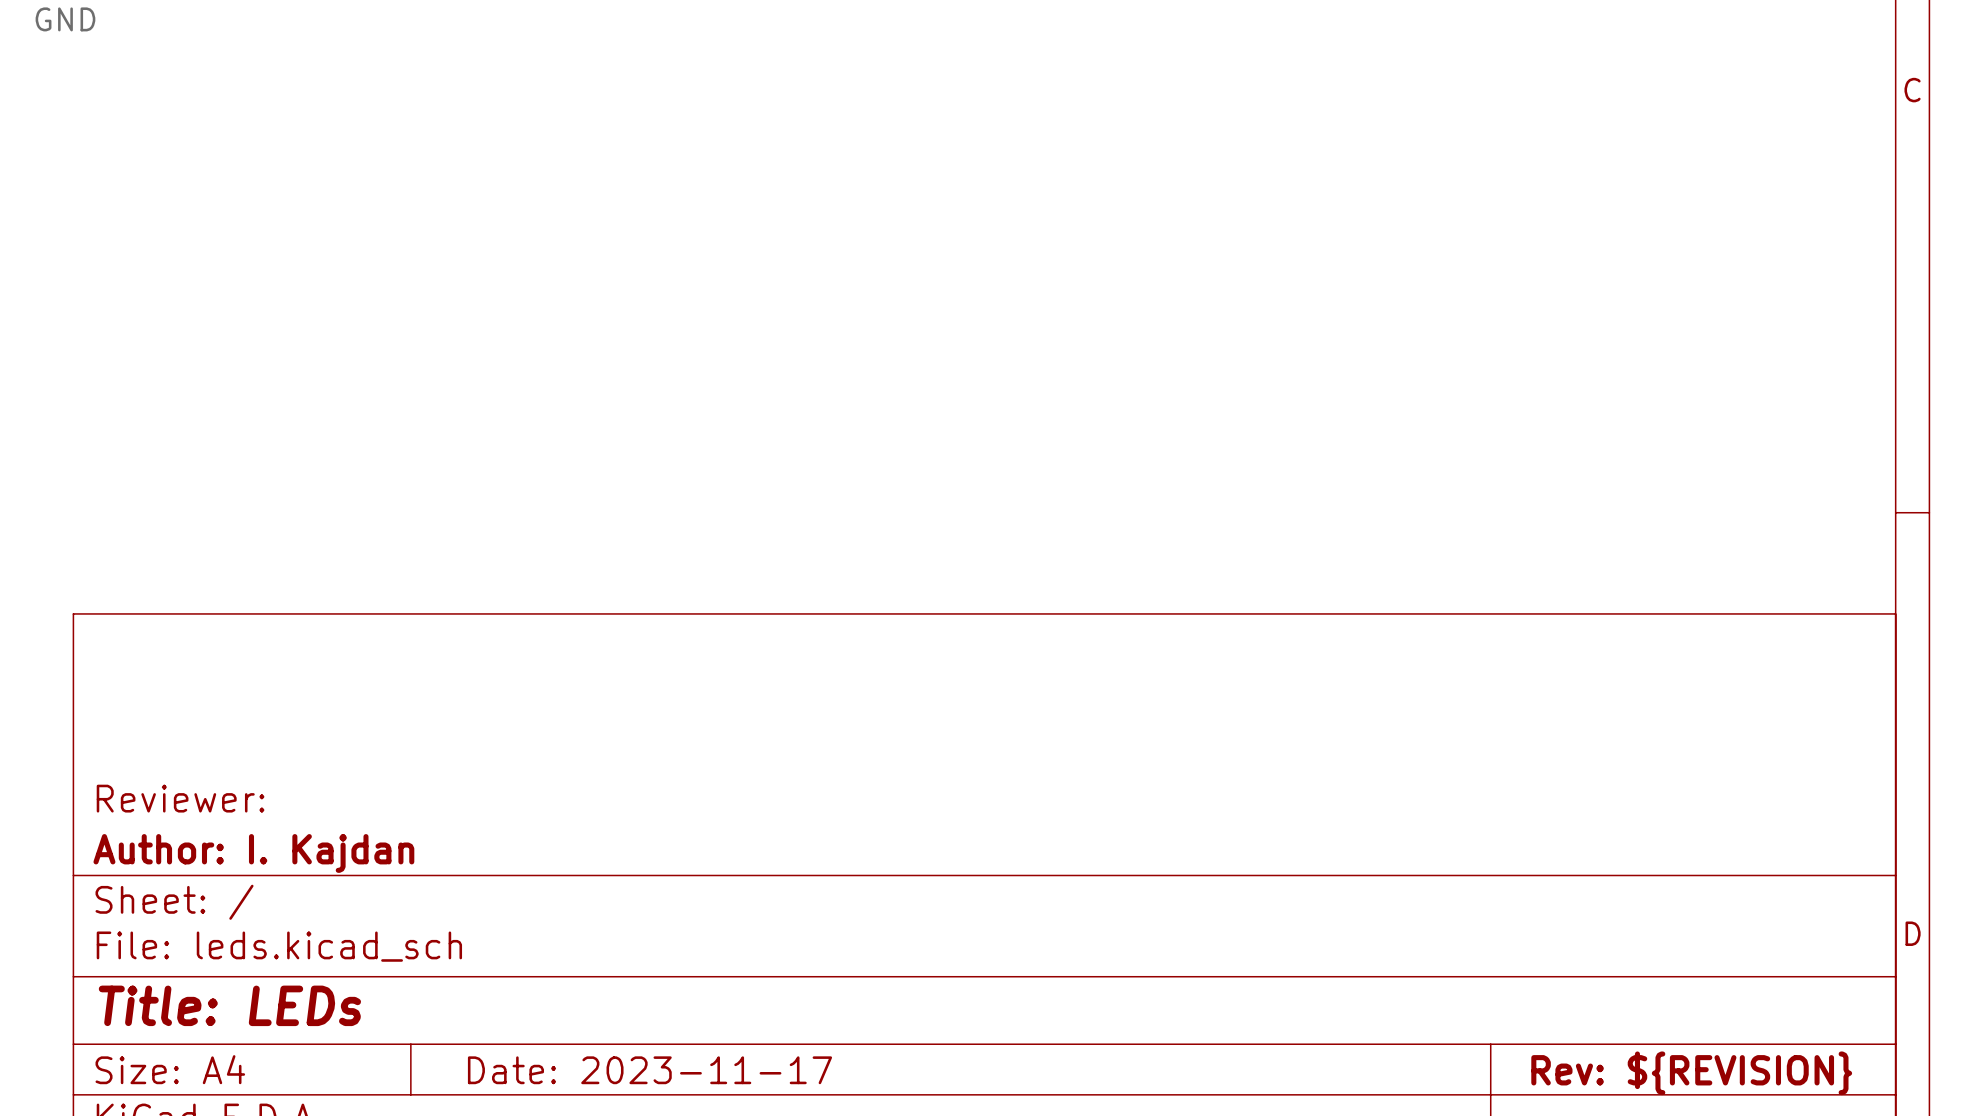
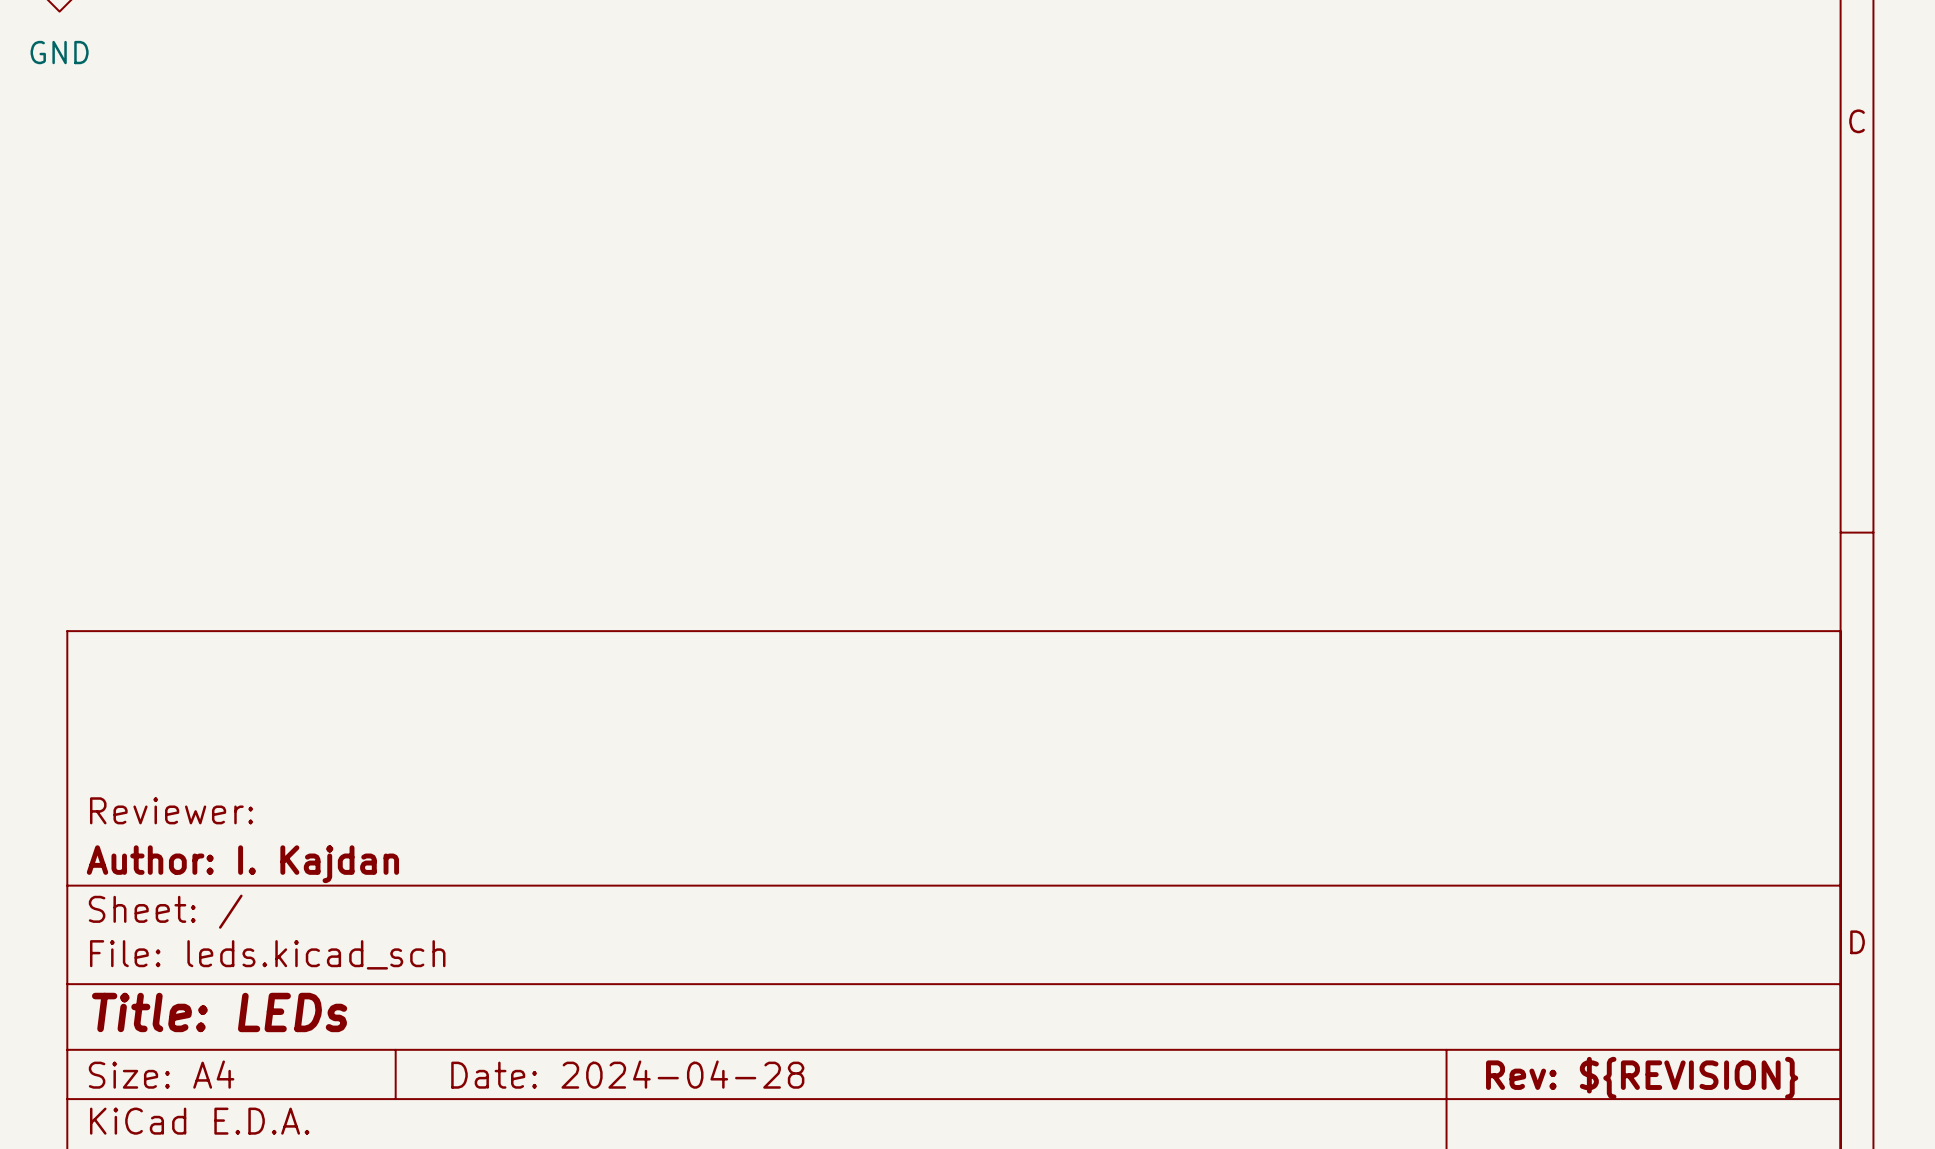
title block: Date: 2023-11-17 (649, 1070) -> Date: 2024-04-28 (627, 1074)

